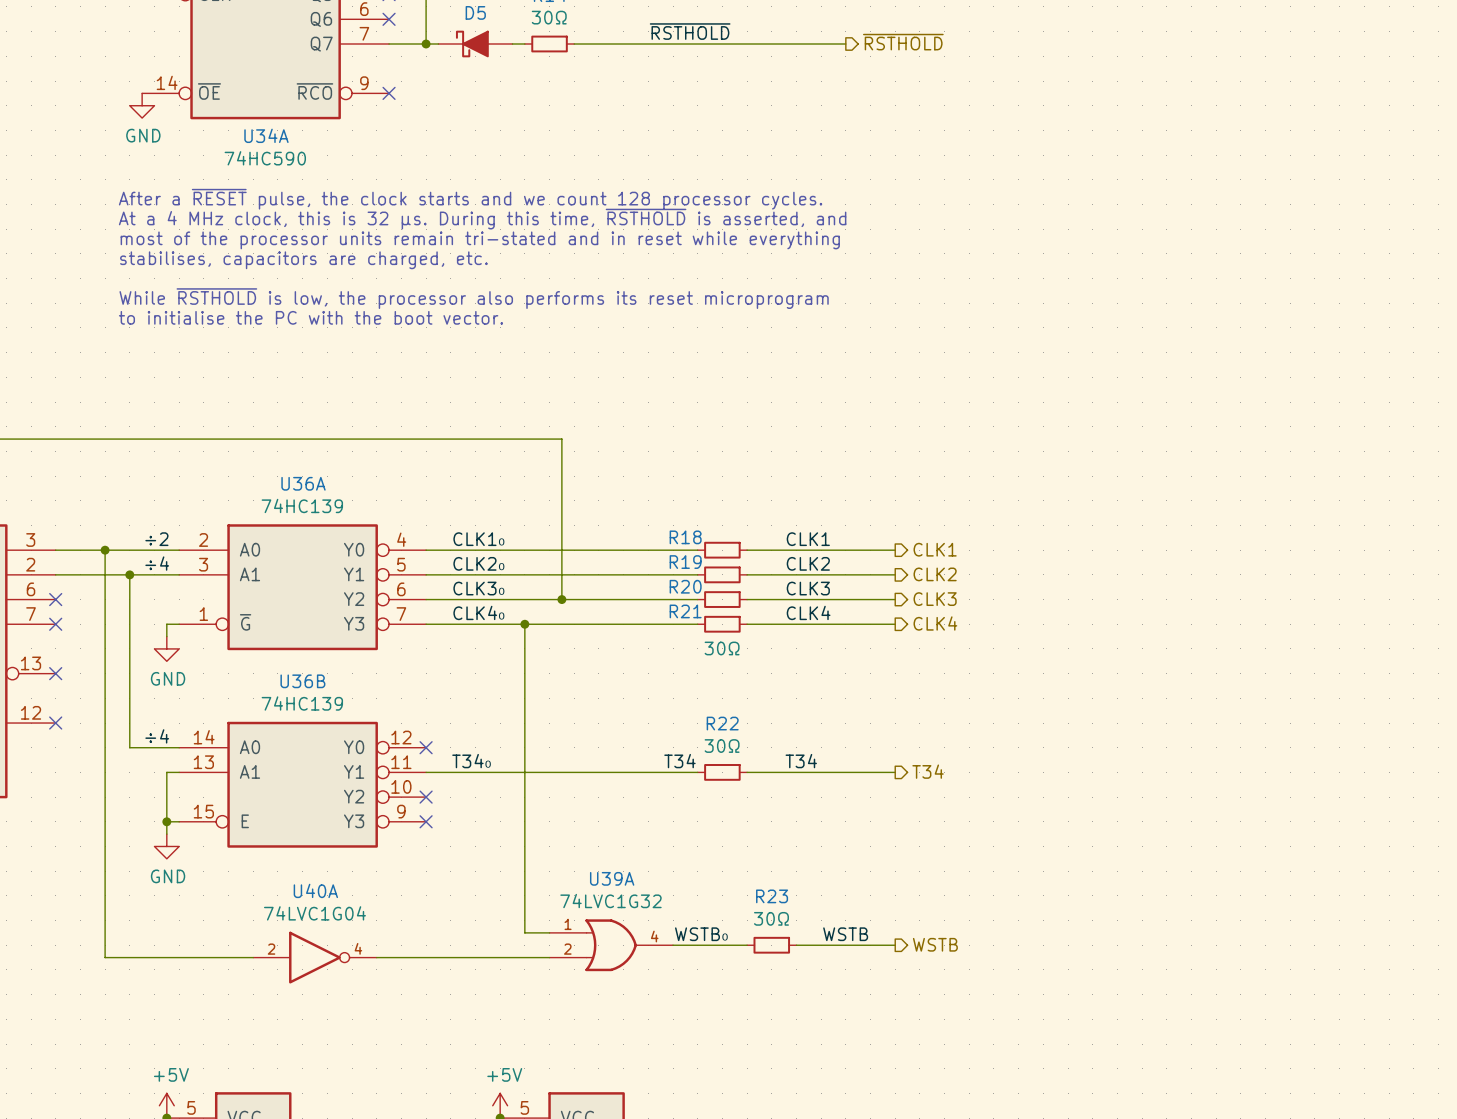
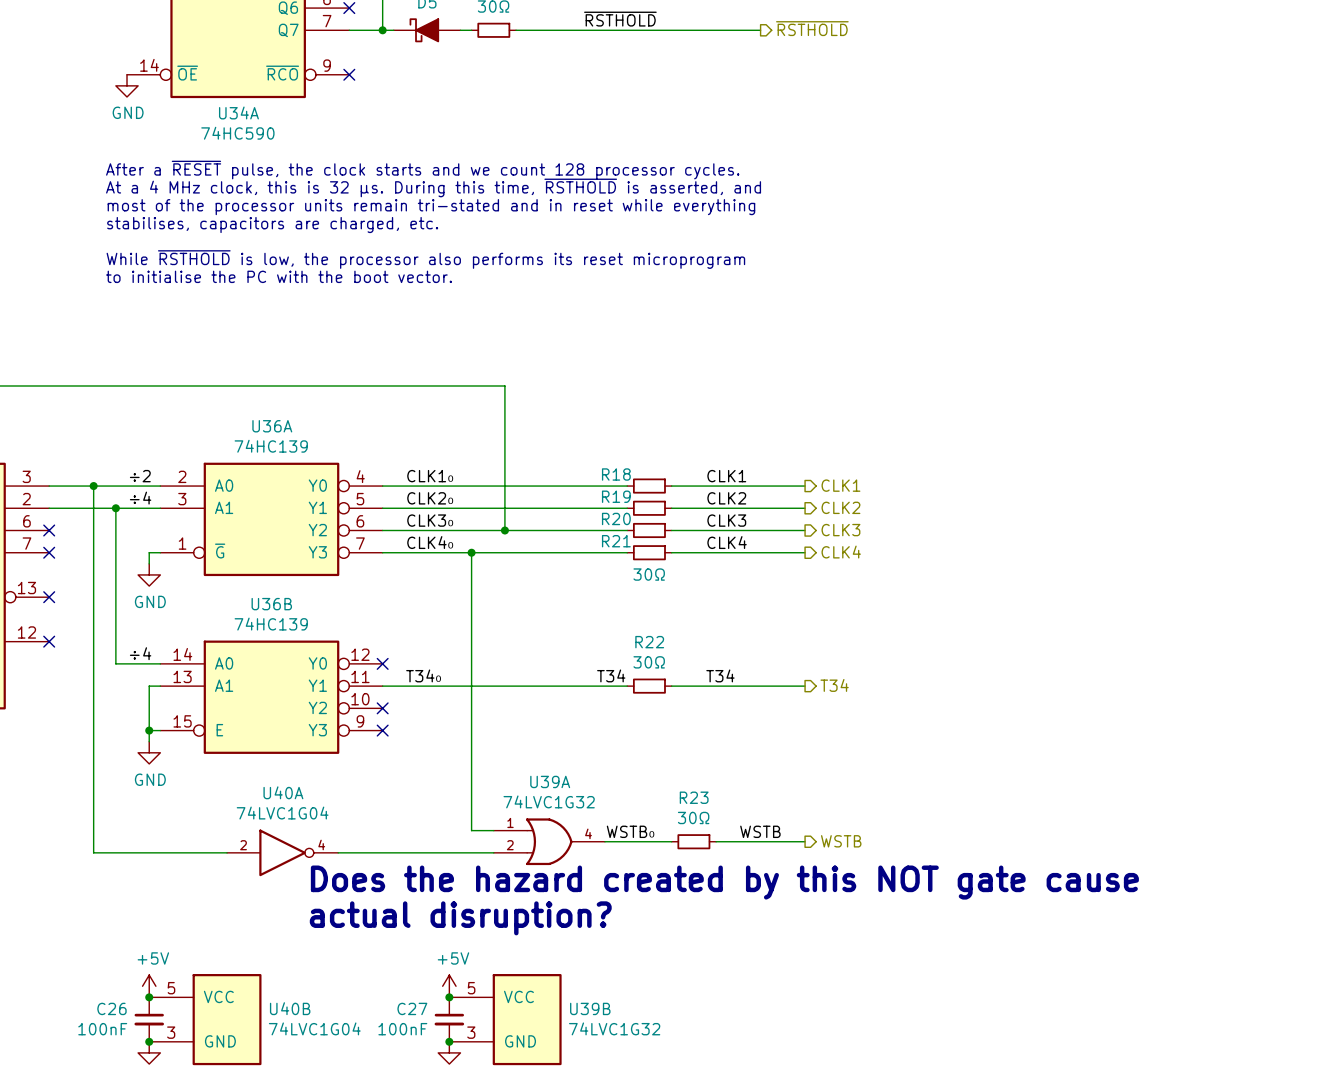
text: none -> Does the hazard created by this NOT gate cause (724, 882)
text: none -> actual disruption? (460, 918)

